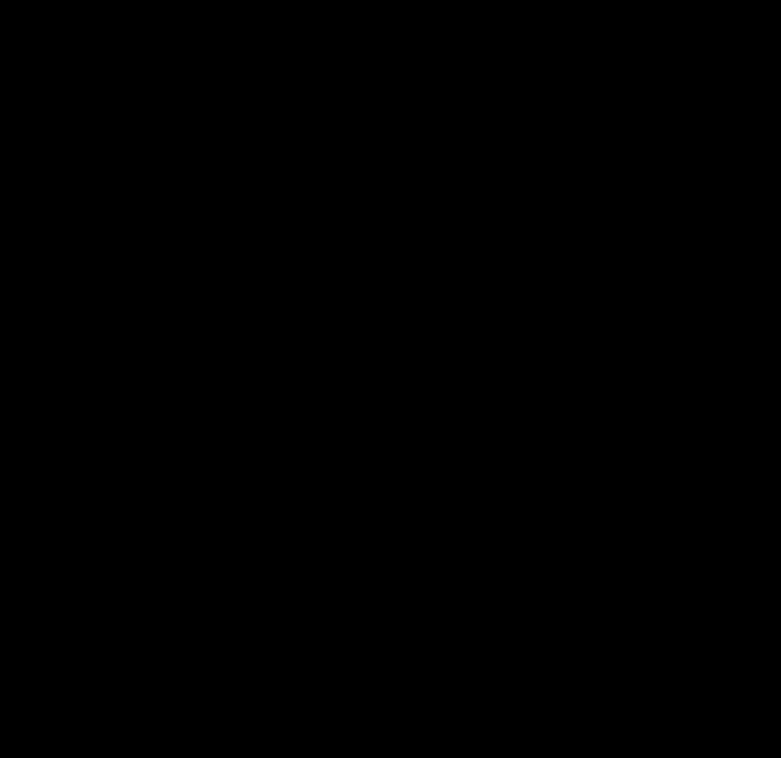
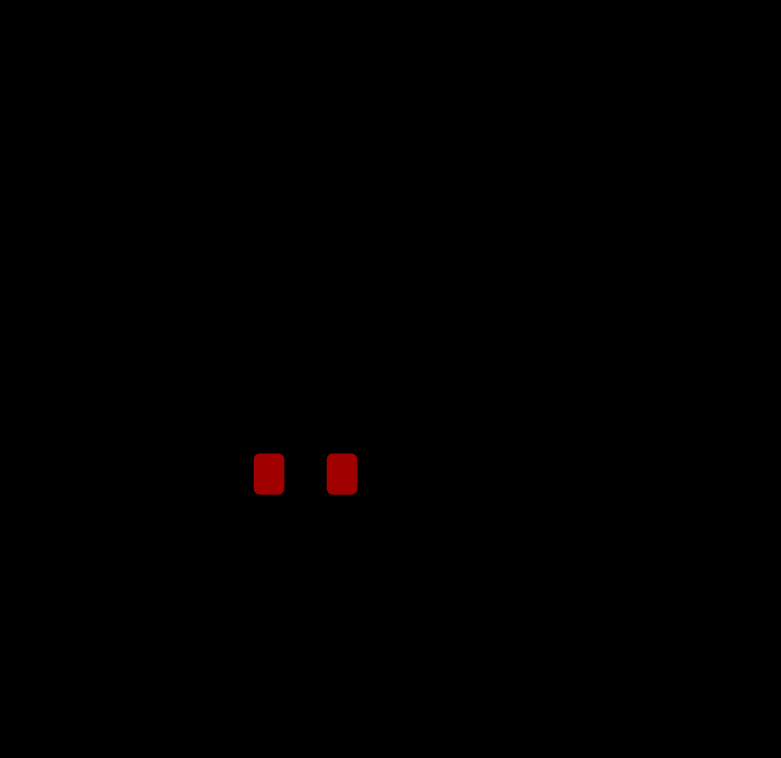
part: none -> (305, 474)

